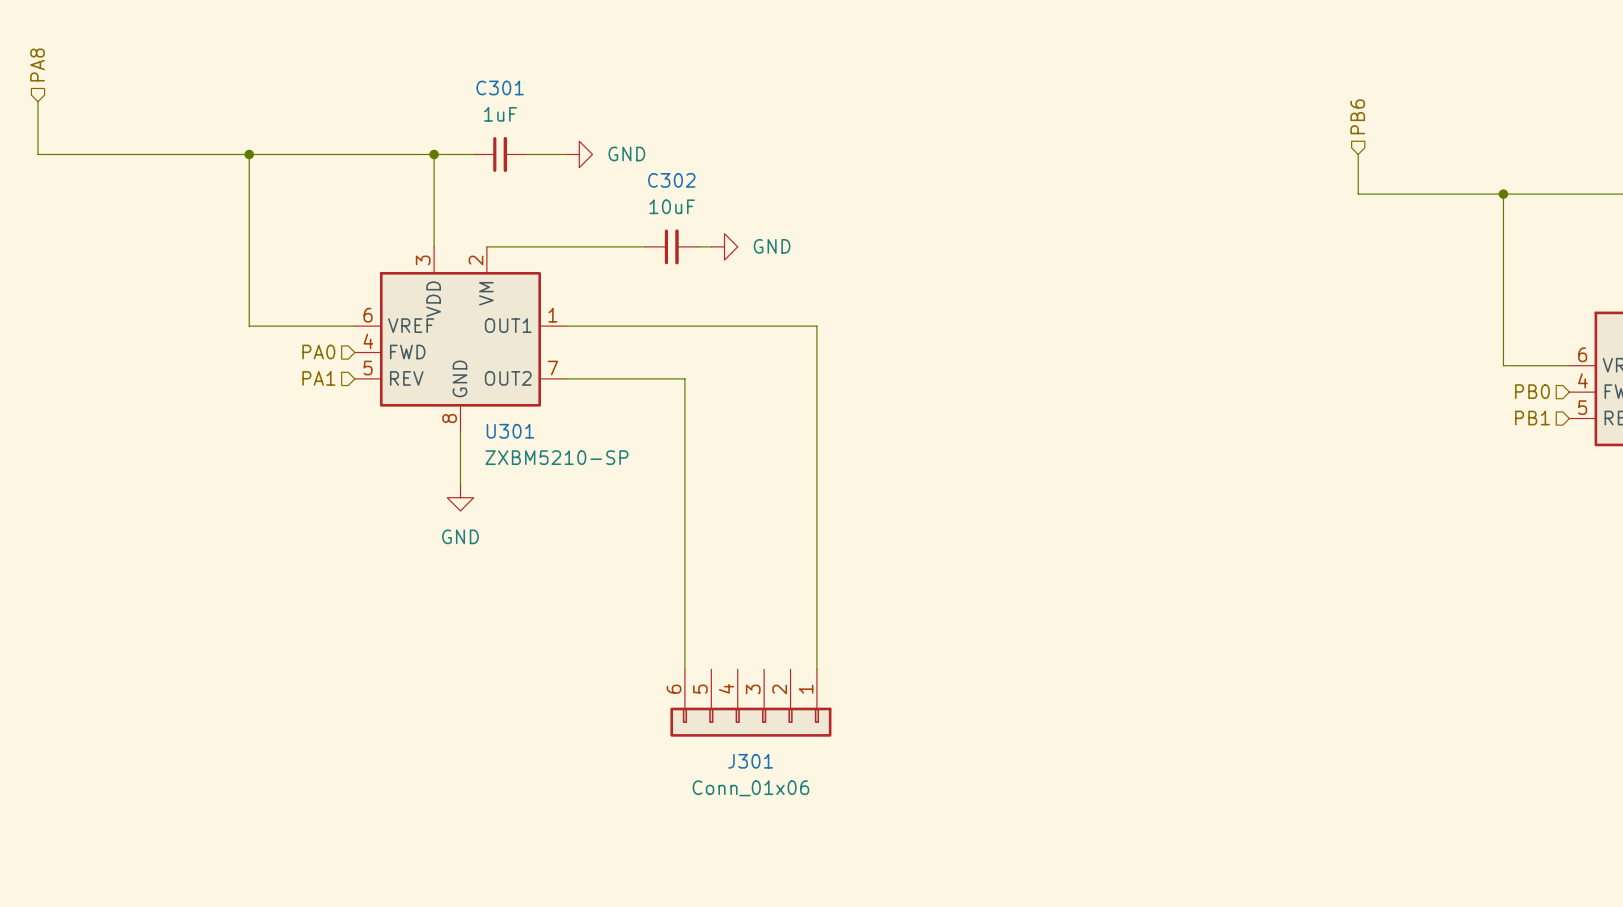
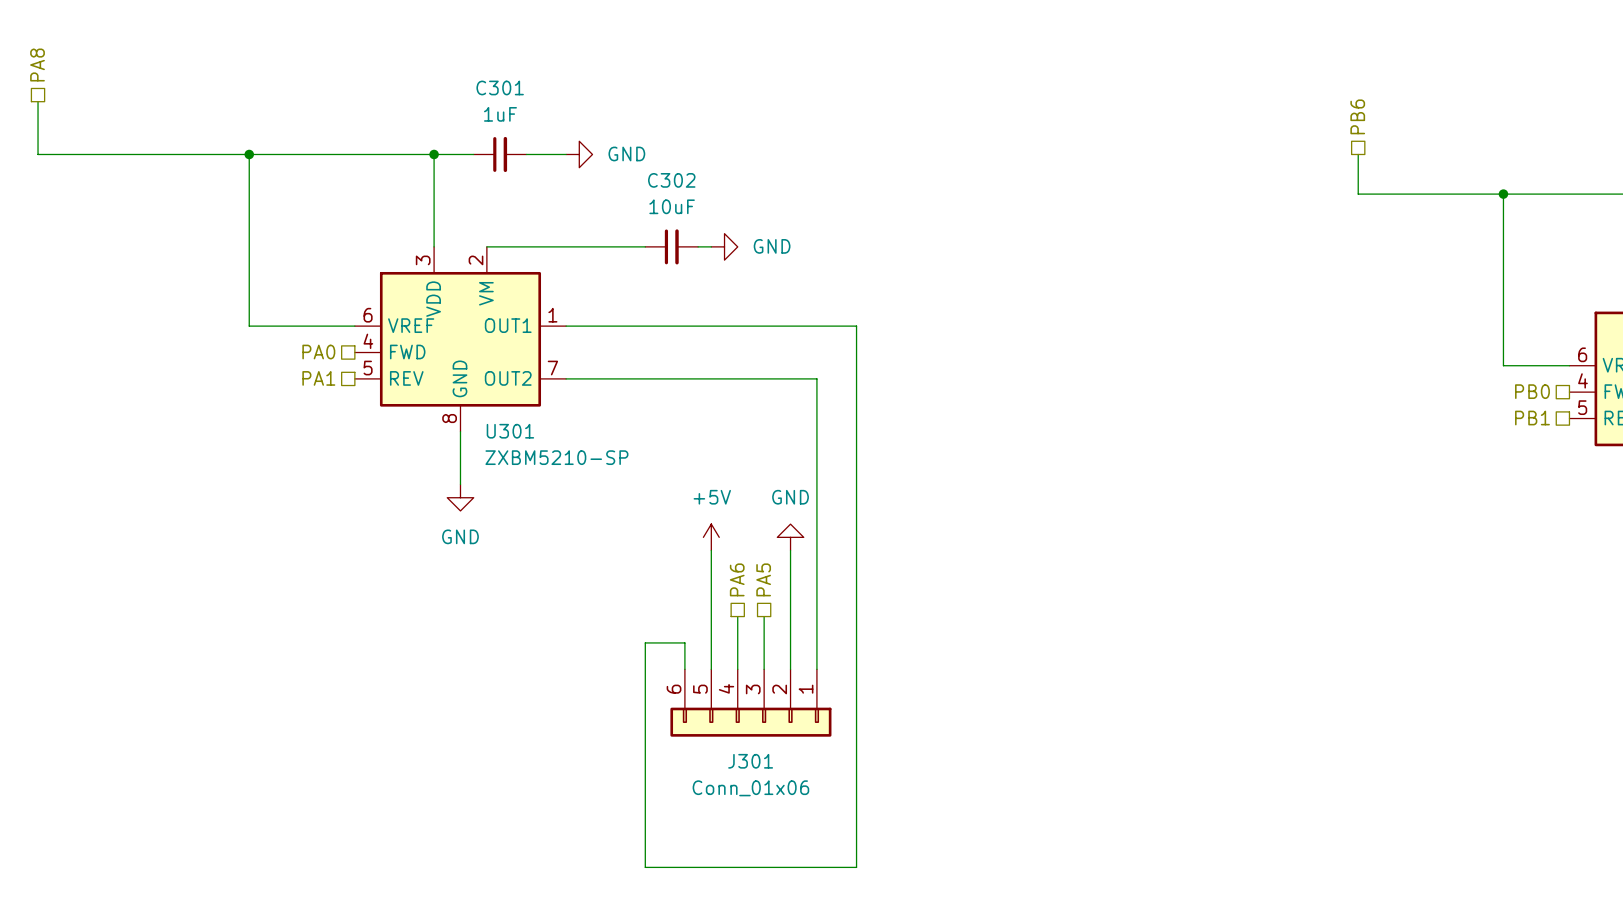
hierarchical label shape: input (37, 65) -> passive (37, 65)
hierarchical label shape: input (1357, 116) -> passive (1357, 116)
wire: (816, 326) (816, 378) -> (684, 378) (816, 378)
hierarchical label shape: input (318, 352) -> passive (318, 352)
hierarchical label shape: input (318, 378) -> passive (318, 378)
wire: (684, 378) (684, 642) -> (816, 326) (856, 326) (856, 867) (645, 867) (645, 642) (684, 642)
hierarchical label shape: input (1532, 391) -> passive (1532, 391)
hierarchical label shape: input (1532, 418) -> passive (1532, 418)
power symbol: none -> +5V (711, 537)
power symbol: none -> GND (790, 537)
wire: none -> (711, 550) (711, 669)
wire: none -> (790, 550) (790, 669)
hierarchical label: none -> PA6 (737, 579)
hierarchical label: none -> PA5 (763, 579)
wire: none -> (737, 616) (737, 669)
wire: none -> (764, 616) (764, 669)

